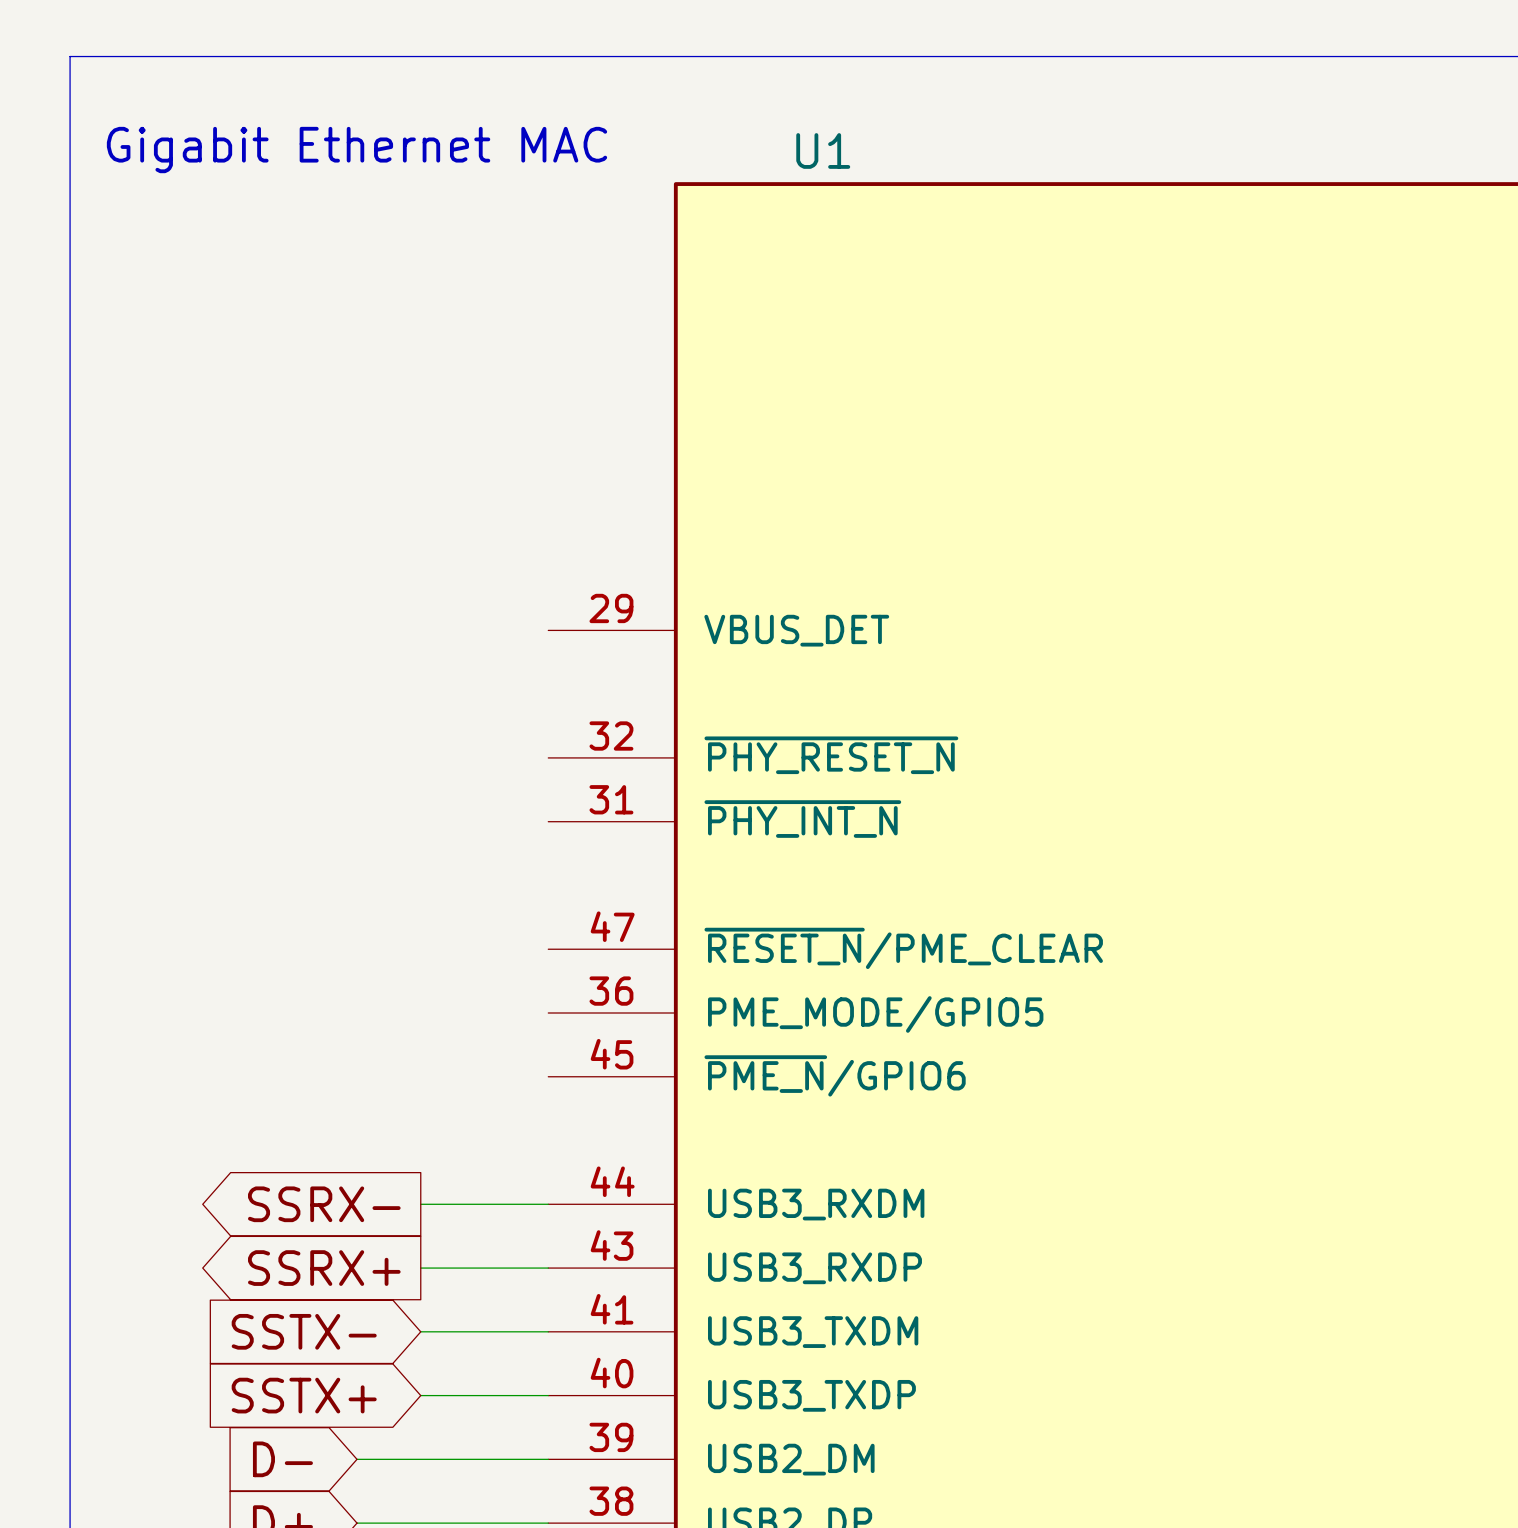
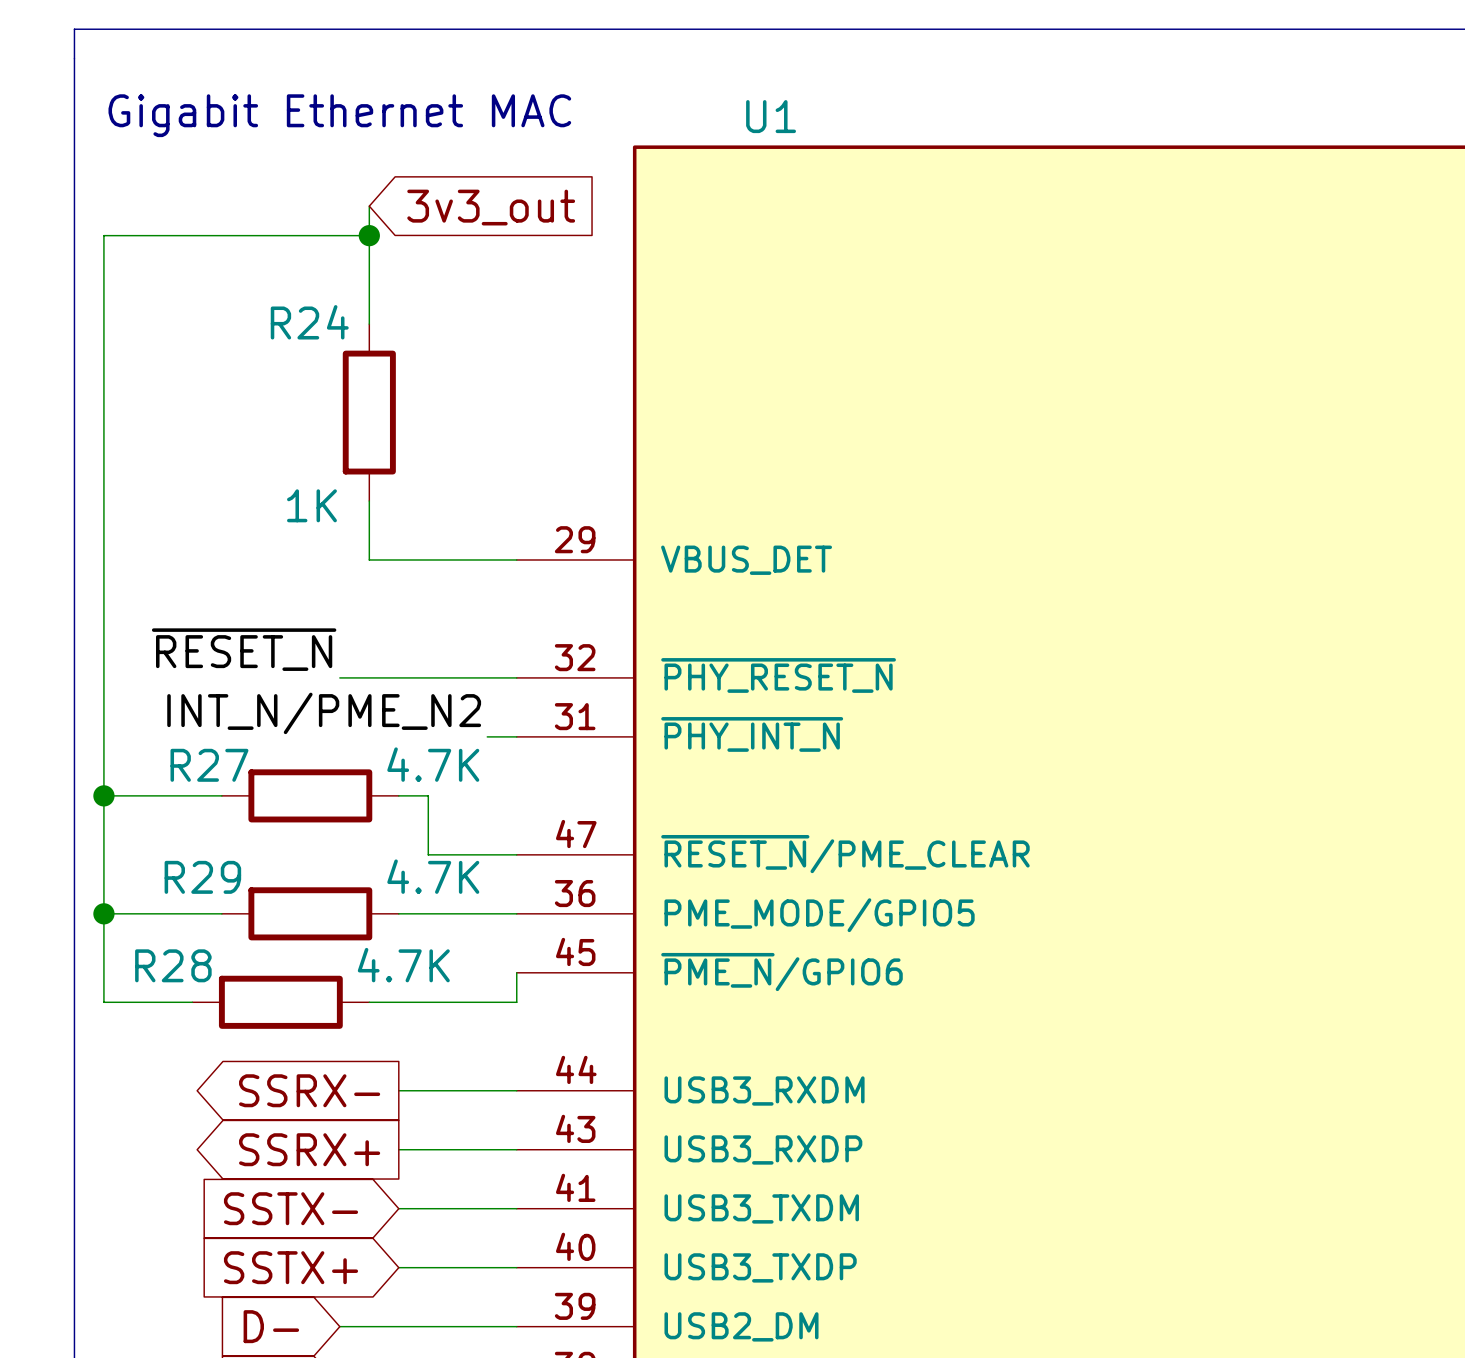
wire: none -> (369, 206) (369, 324)
global label: none -> 3v3_out (491, 207)
wire: none -> (369, 235) (103, 235) (103, 1002) (192, 1002)
junction: none -> (369, 235)
R24: none -> 1K (369, 412)
wire: none -> (369, 501) (369, 559) (516, 559)
label: none -> ~{RESET_N} (244, 649)
wire: none -> (339, 677) (516, 677)
label: none -> INT_N/PME_N2 (324, 713)
wire: none -> (487, 736) (516, 736)
wire: none -> (103, 795) (221, 795)
junction: none -> (103, 795)
R27: none -> 4.7K (310, 795)
wire: none -> (398, 795) (428, 795) (428, 854) (516, 854)
wire: none -> (103, 913) (221, 913)
junction: none -> (103, 913)
R29: none -> 4.7K (310, 913)
wire: none -> (398, 913) (516, 913)
wire: none -> (516, 972) (516, 1002) (369, 1002)
R28: none -> 4.7K (280, 1002)

